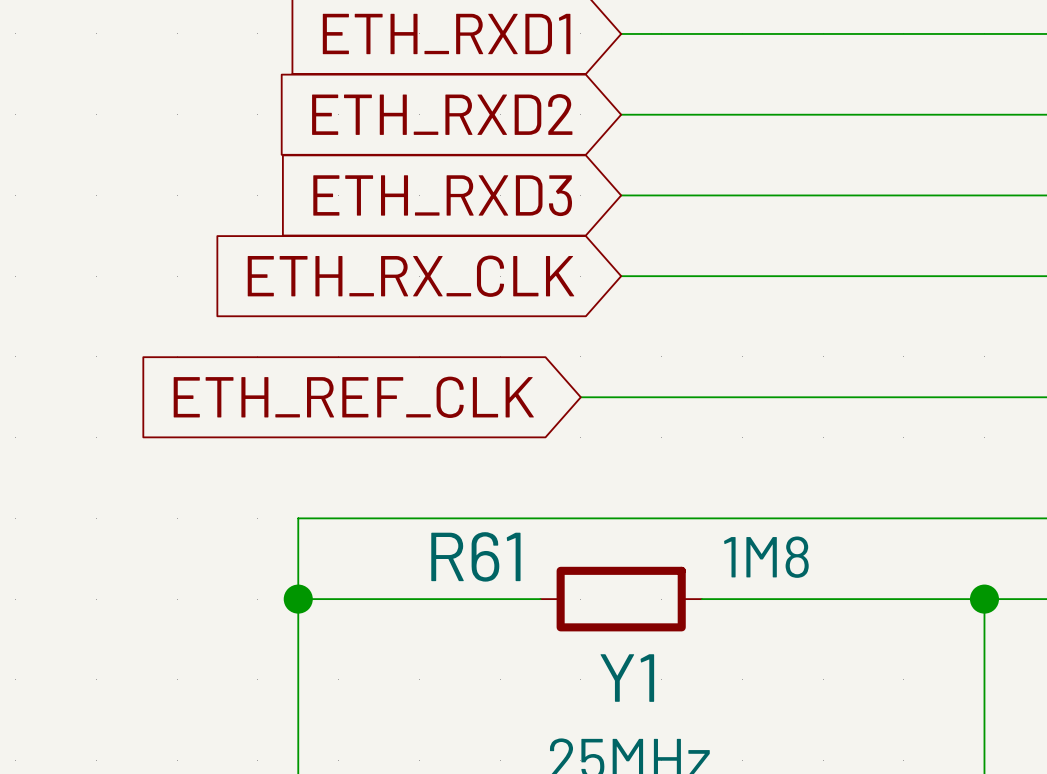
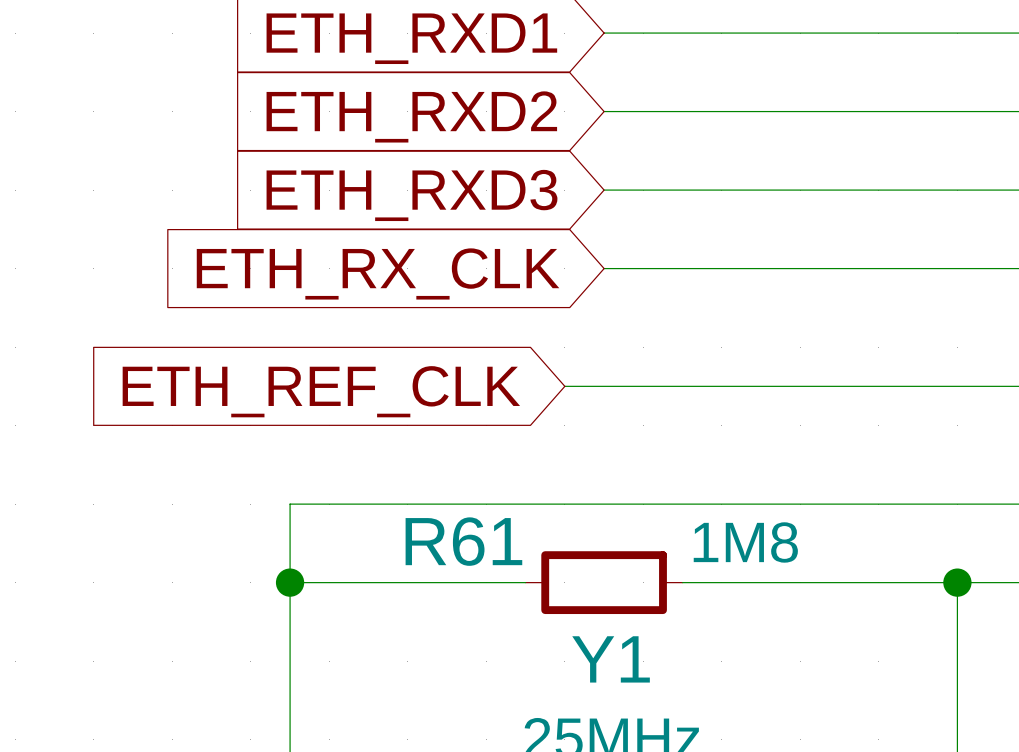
R61 text position: 1M8 (766, 557) -> 1M8 (745, 542)

